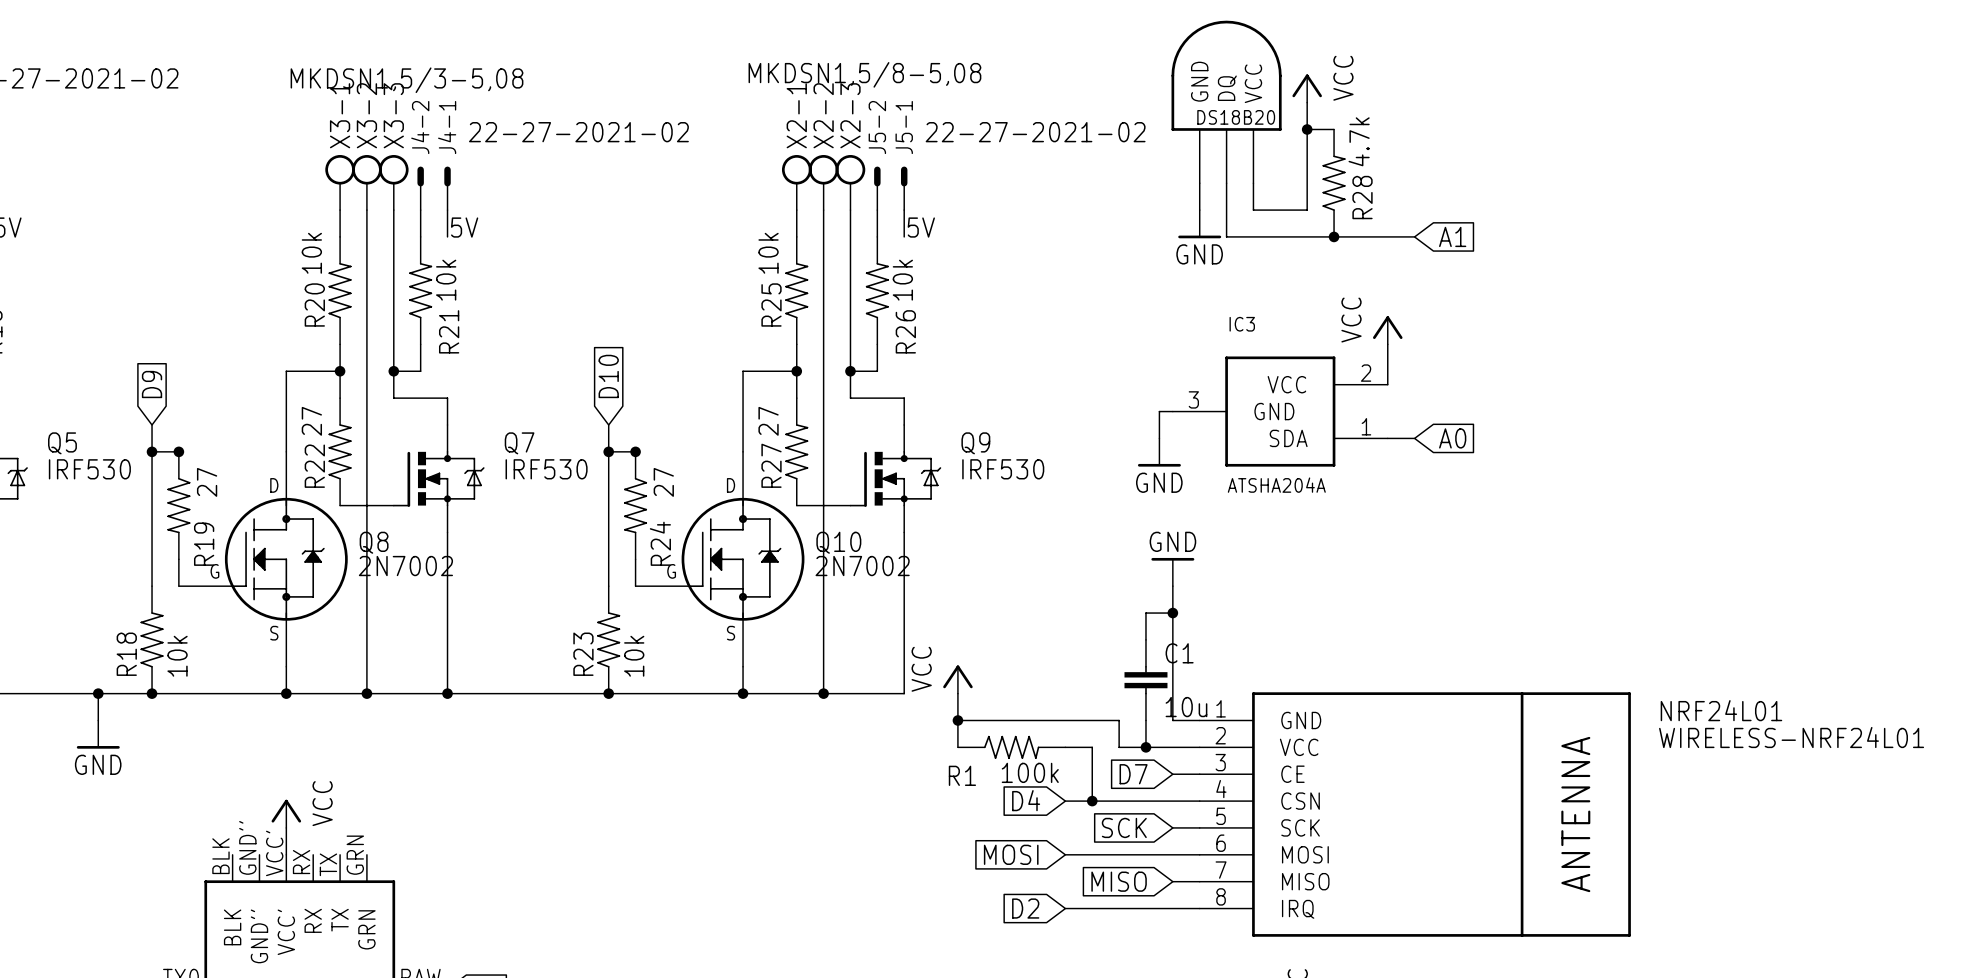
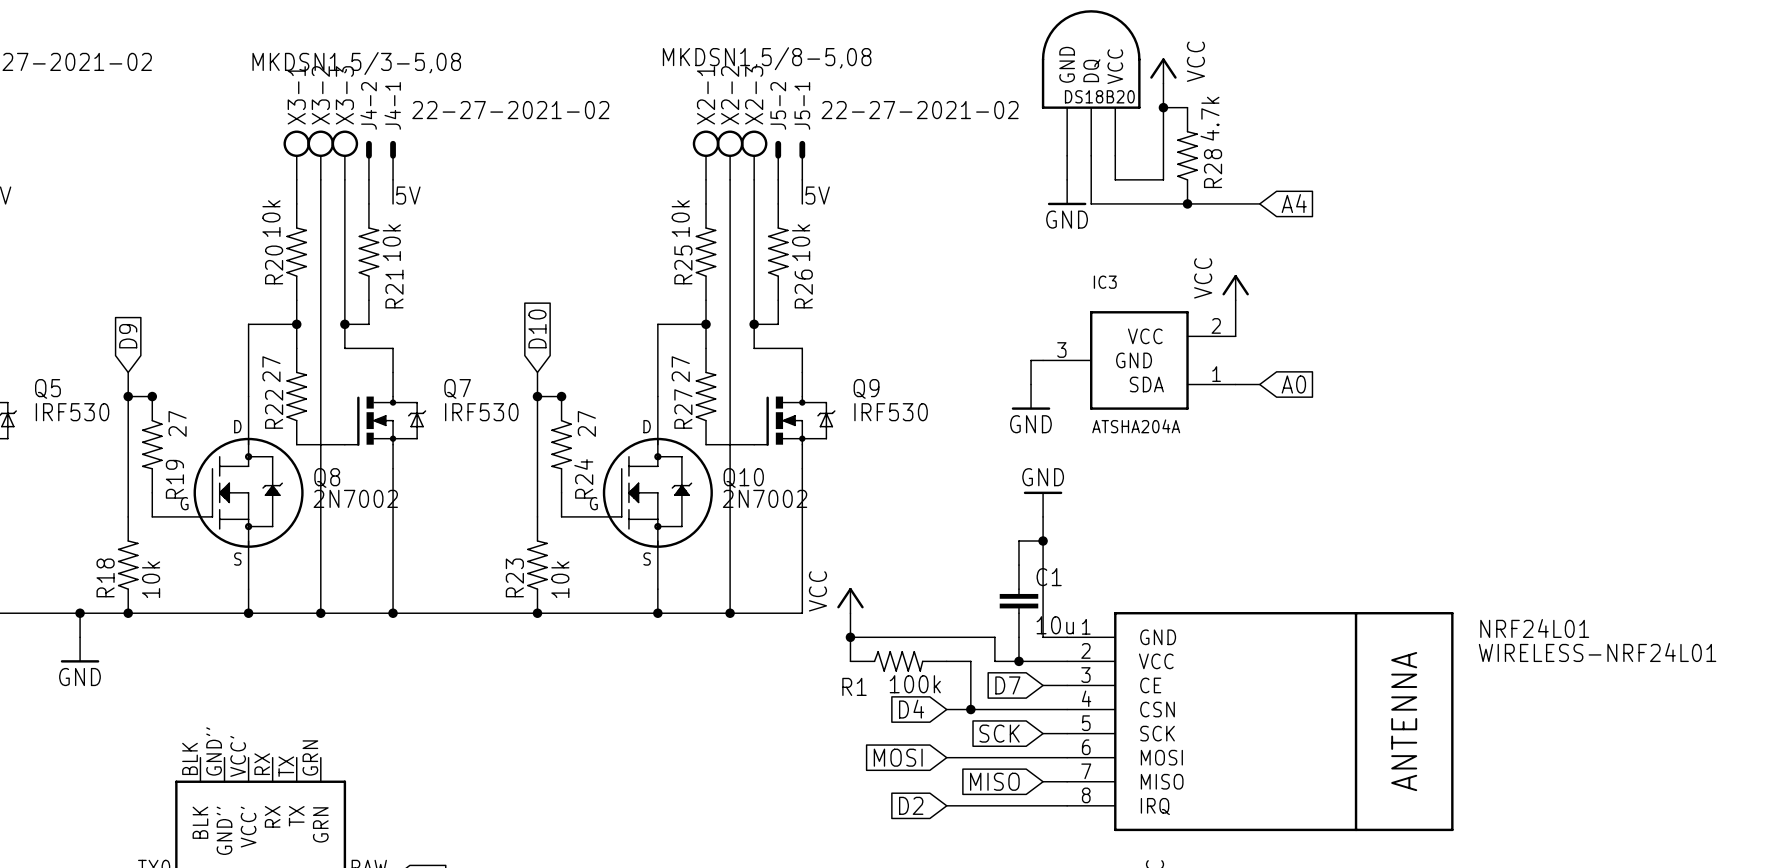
global label: A1 (1452, 236) -> A4 (1294, 203)
power symbol: VCC (286, 813) -> none
wire: (286, 827) (286, 854) -> none

